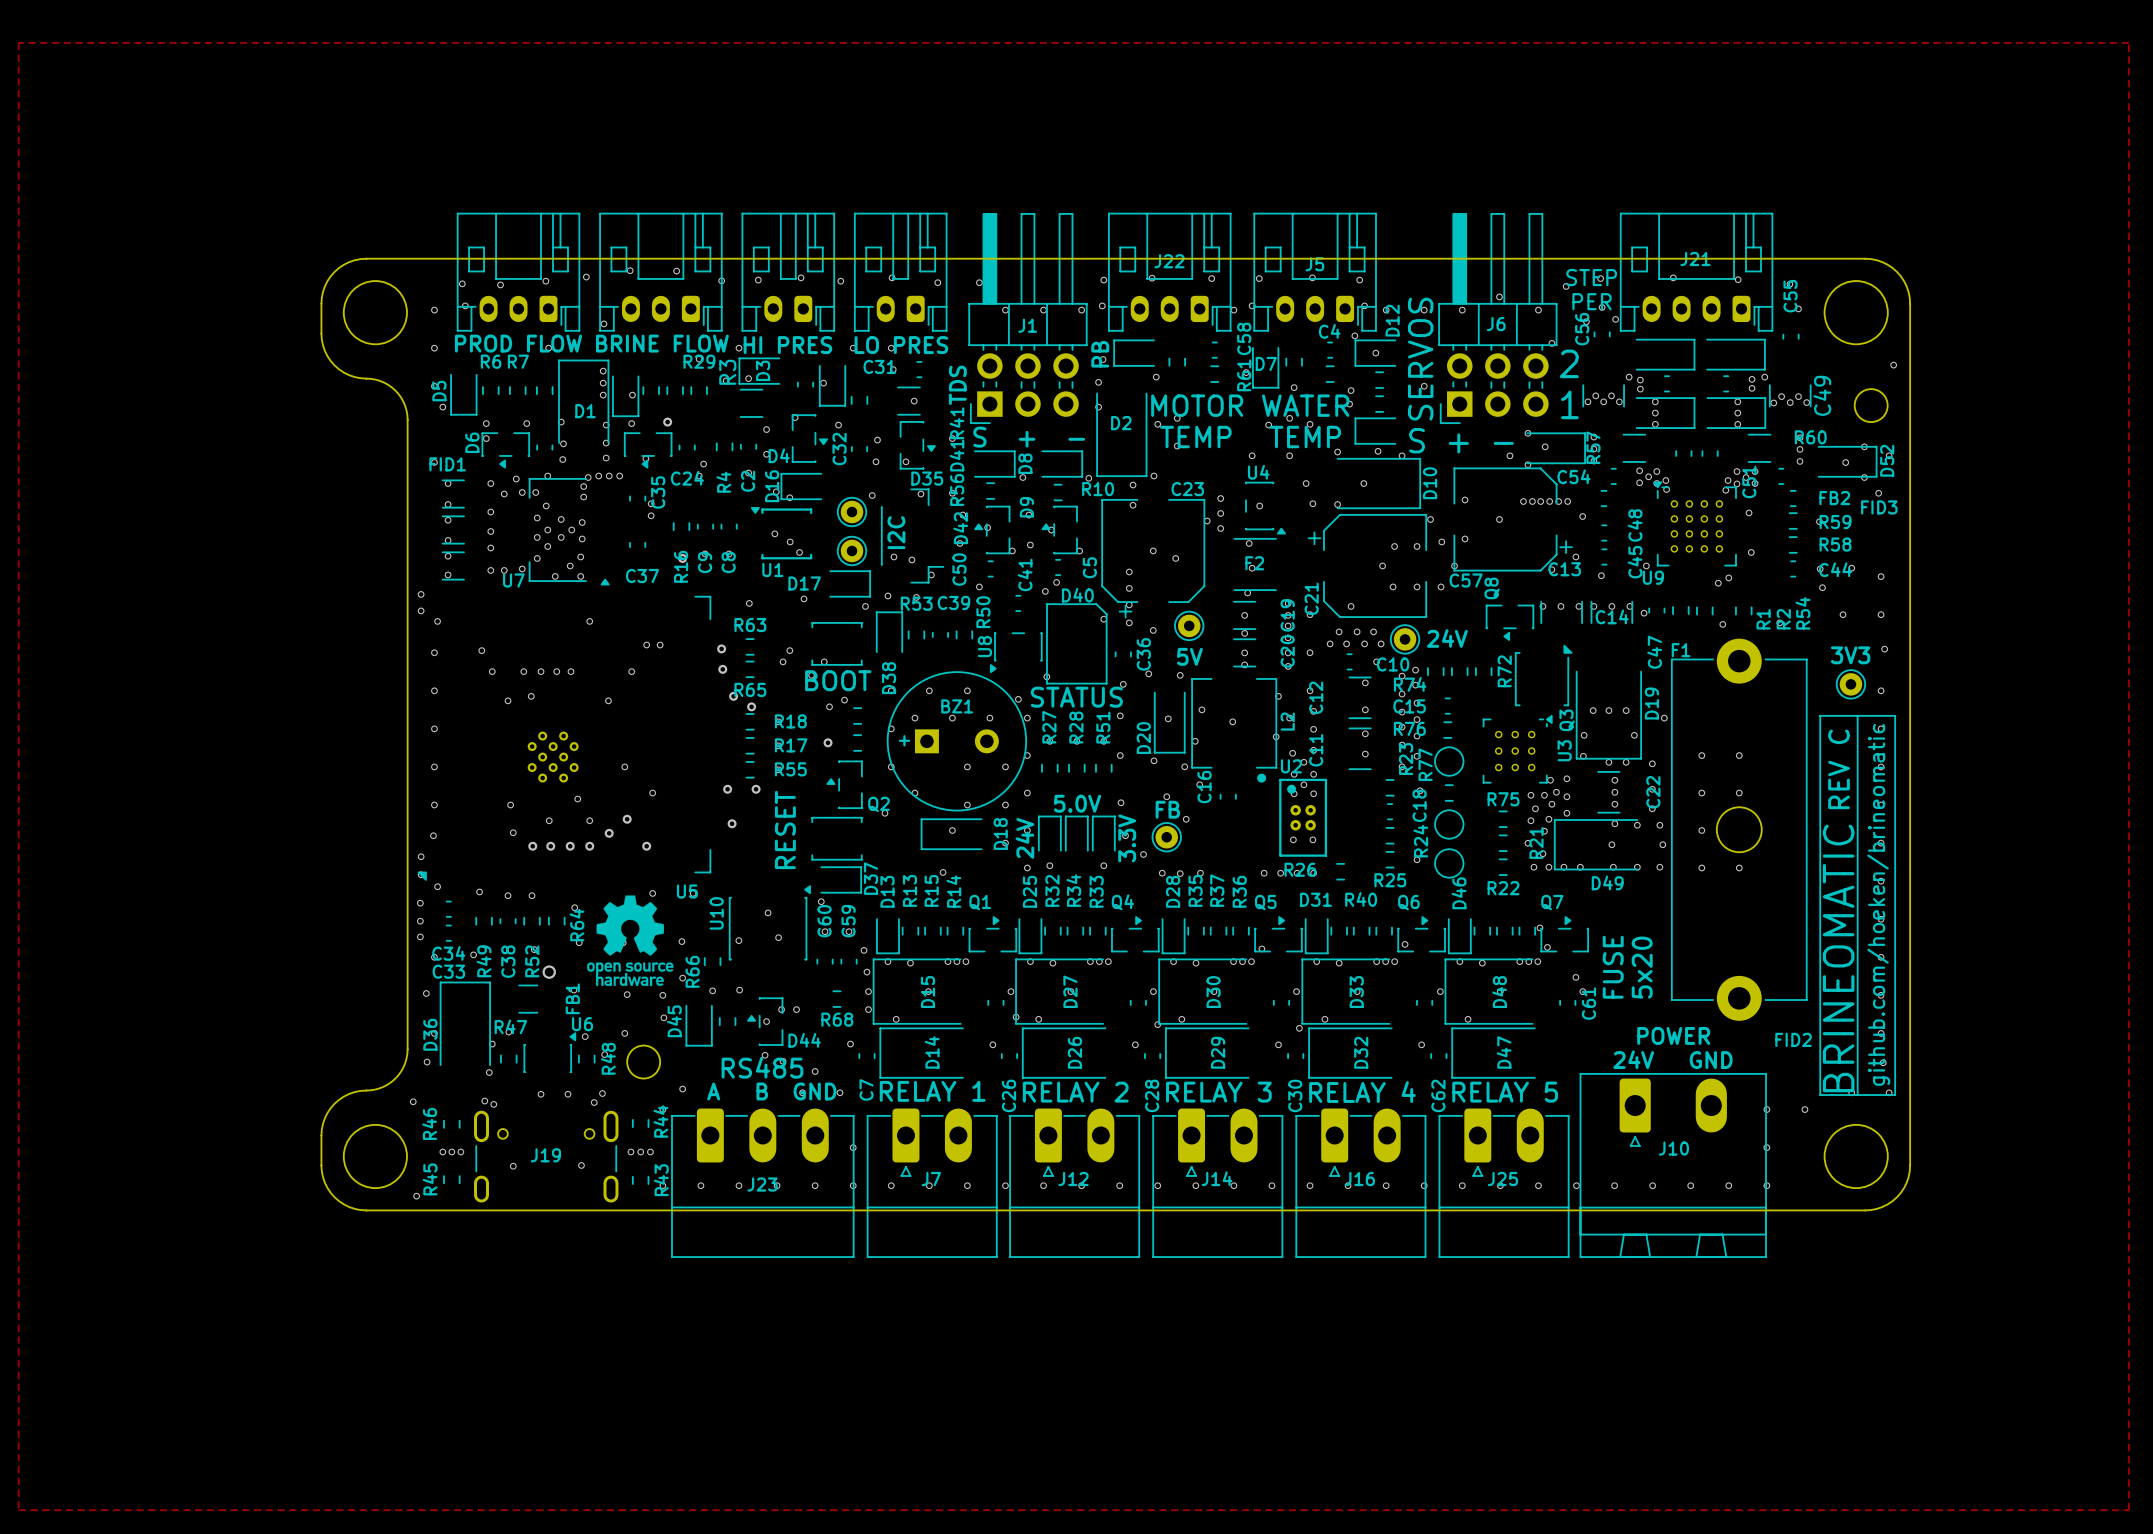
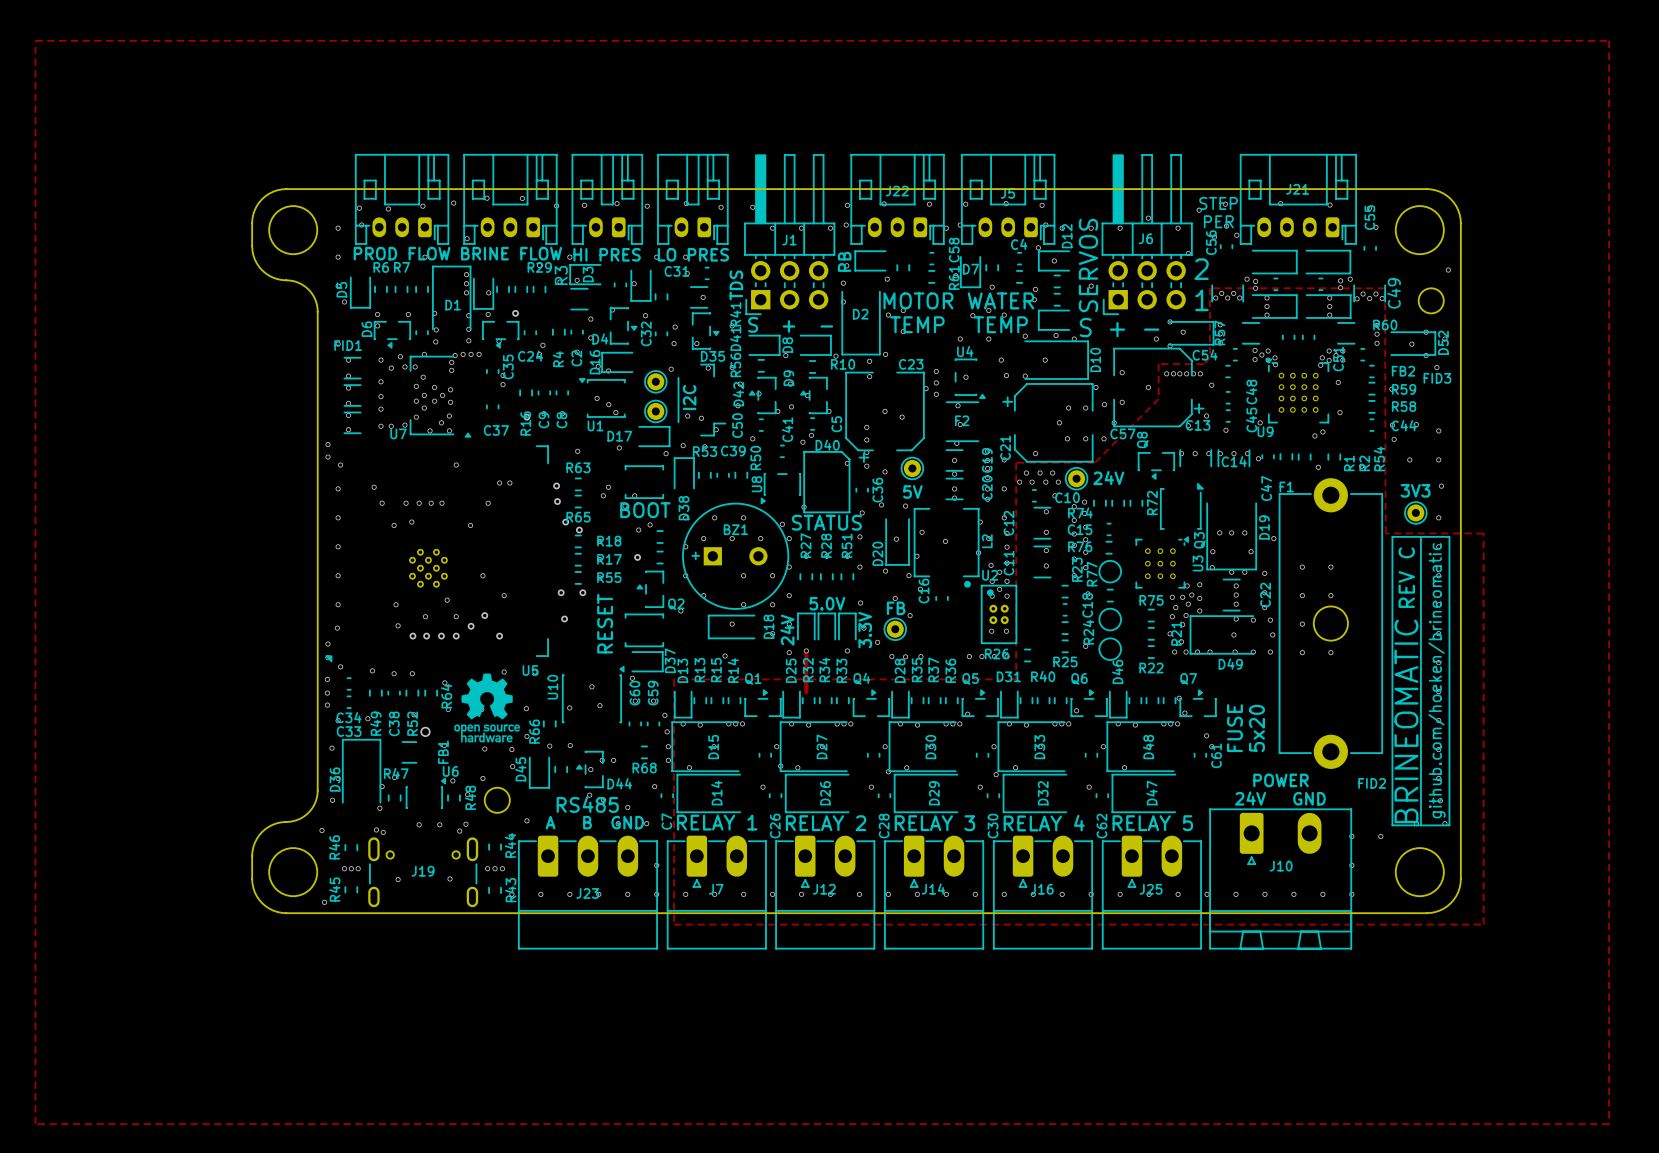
zone outline: (18, 42) (2128, 42) (2128, 1510) (18, 1510) (18, 42) -> (35, 40) (35, 1124) (1609, 1124) (1609, 40) (35, 40)
zone outline: none -> (1210, 288) (1385, 288) (1385, 533) (1483, 533) (1483, 924) (674, 924) (674, 679) (1016, 679) (1016, 462) (1094, 462) (1158, 398) (1158, 364) (1203, 364) (1210, 357) (1210, 288)
track: none -> (806, 650) (806, 691)

